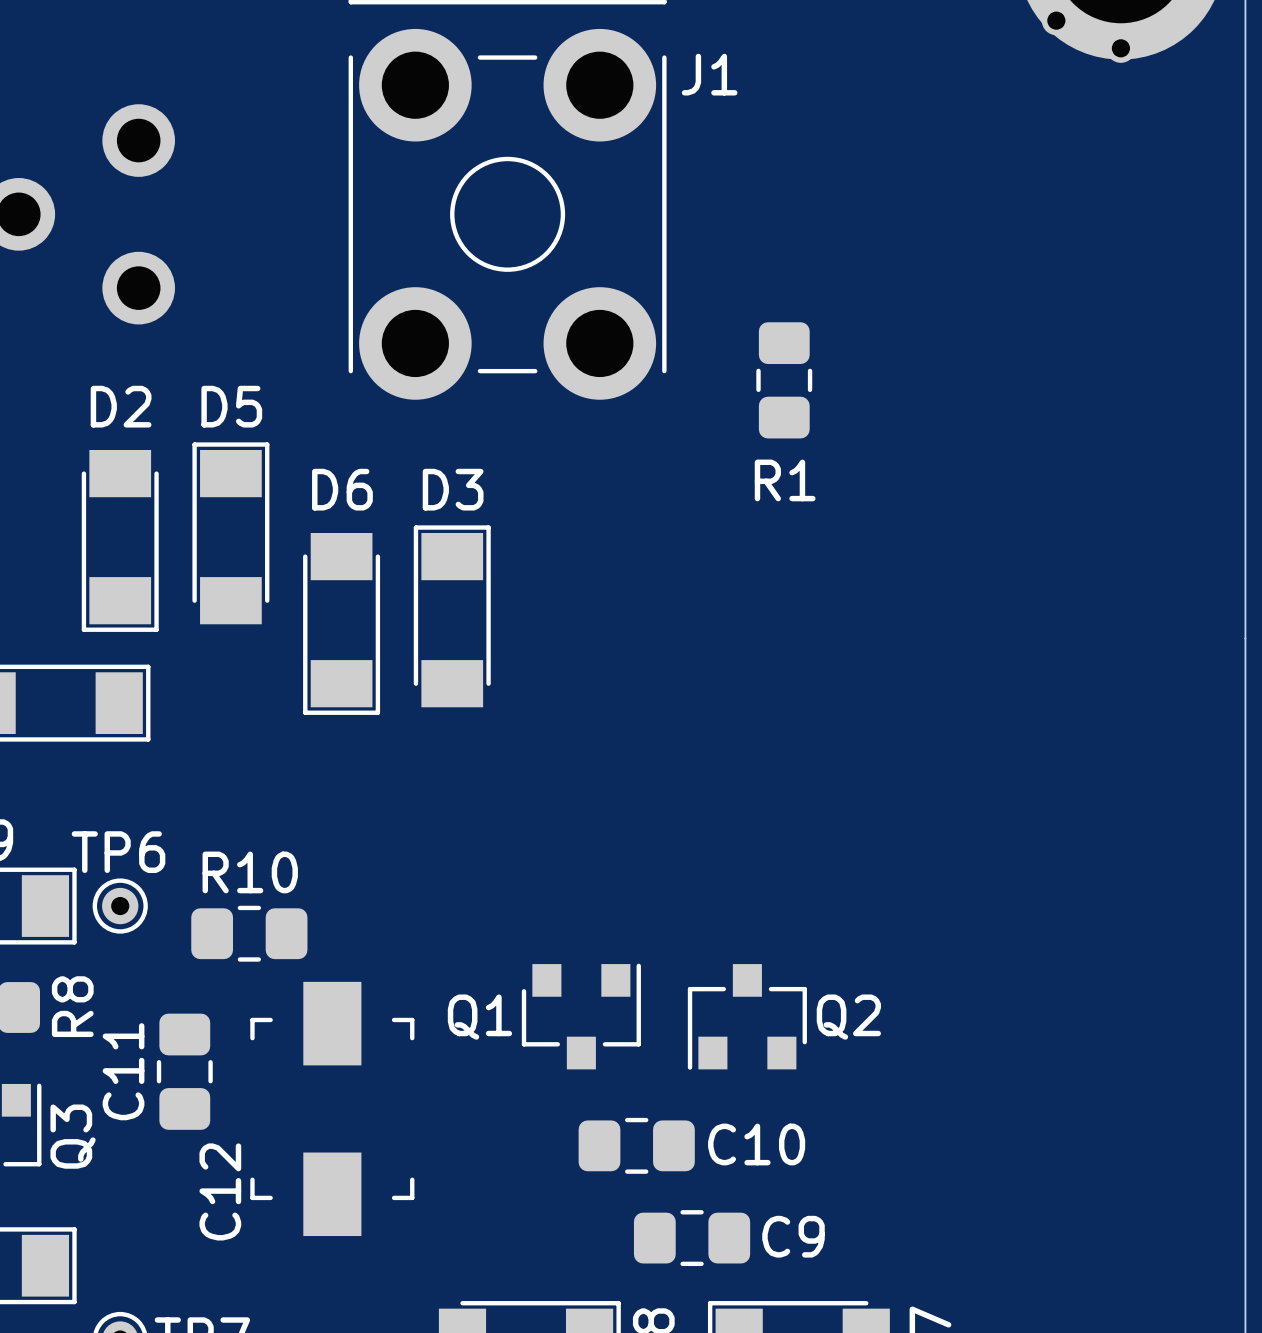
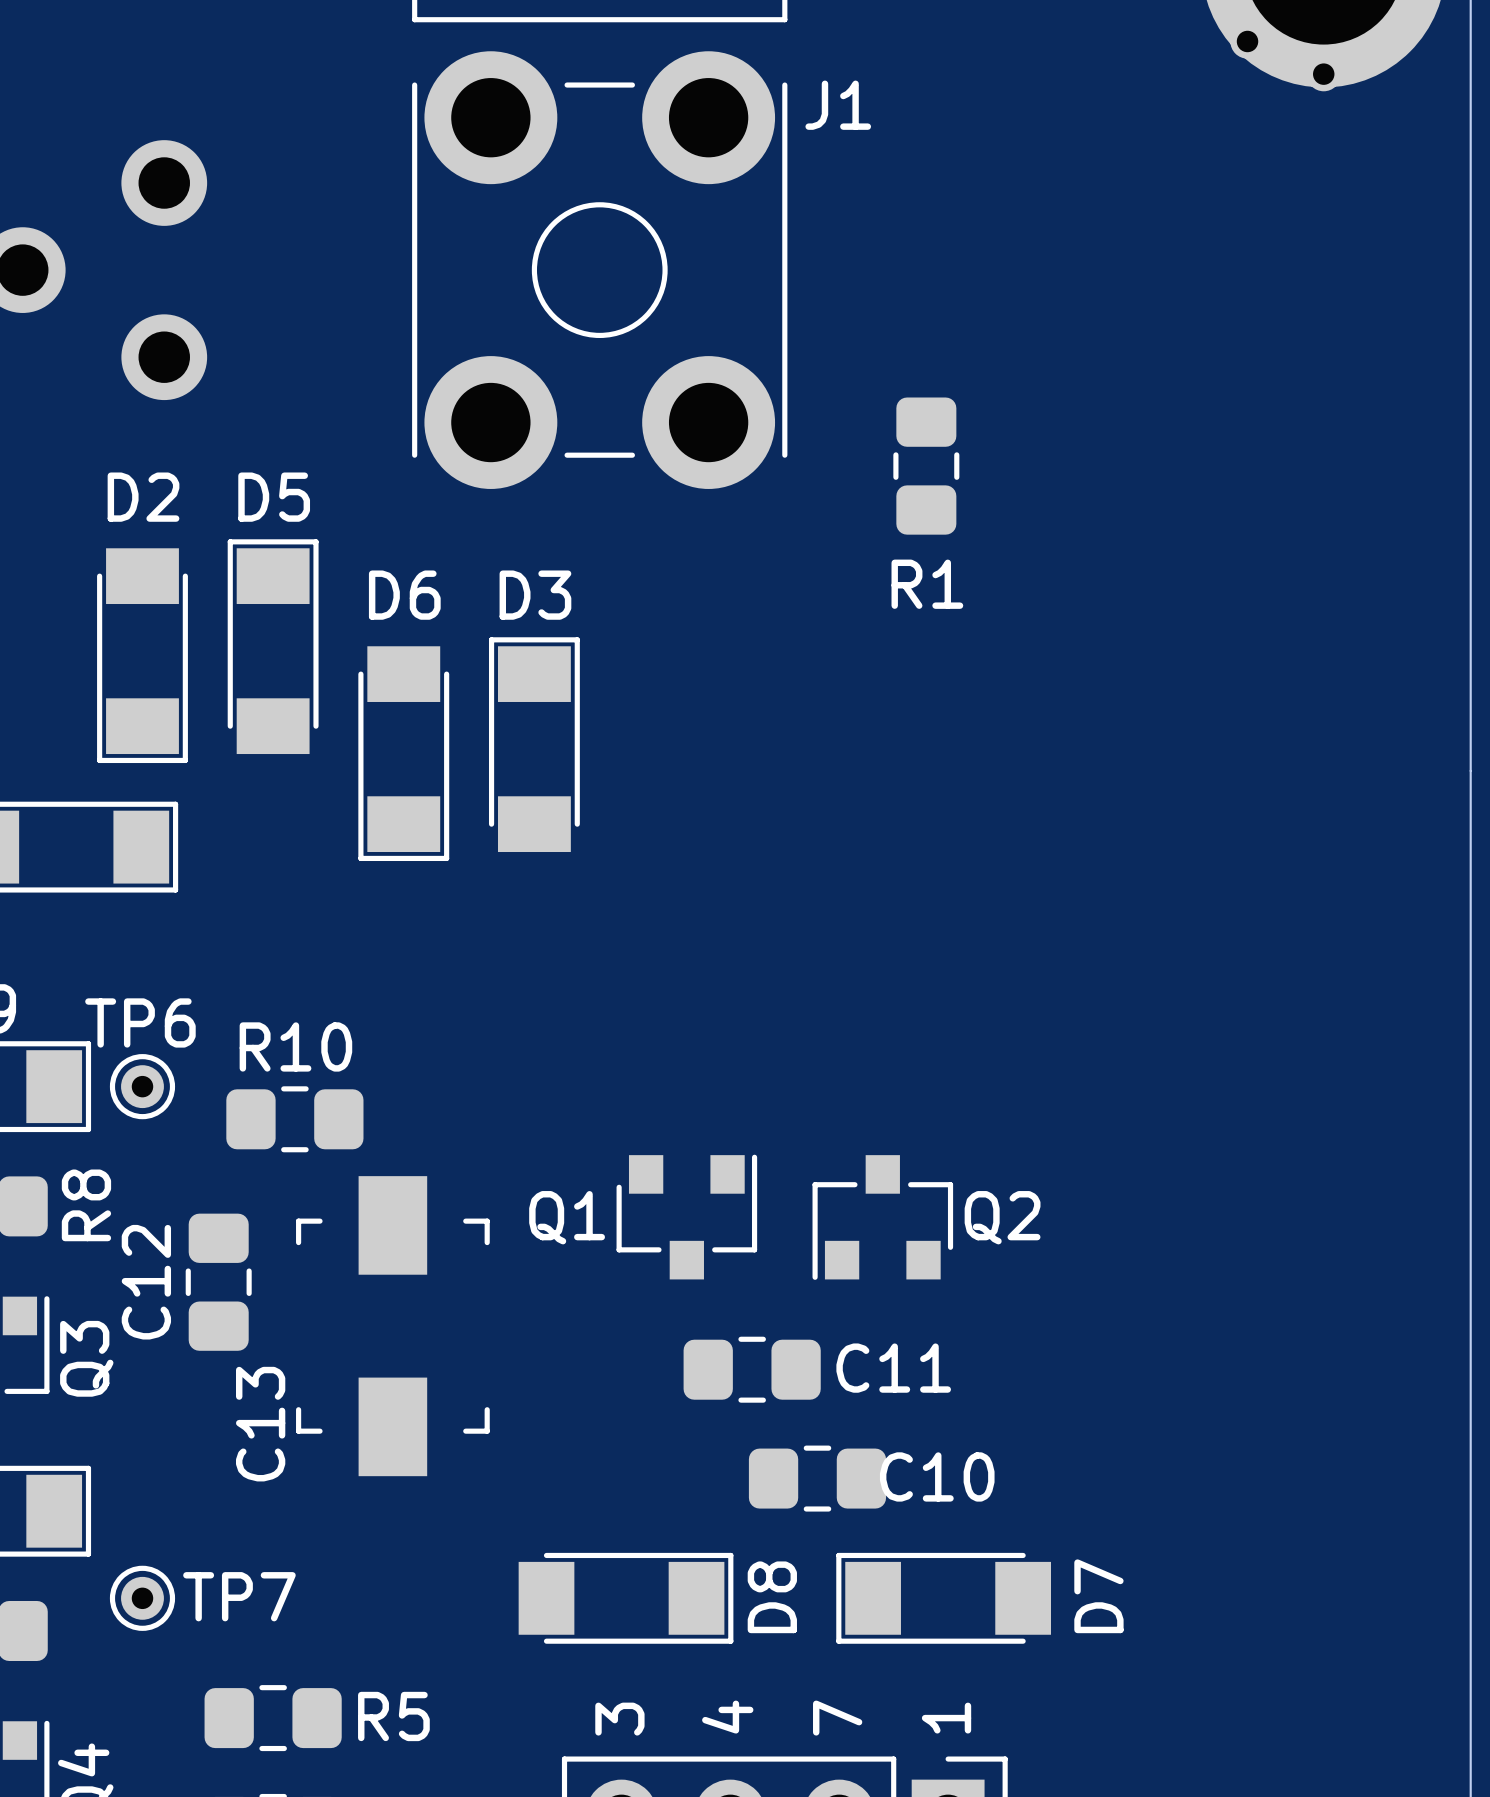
C11 name: C11 (123, 1071) -> C12 (146, 1282)
C10 name: C10 (756, 1144) -> C11 (893, 1368)
C12 name: C12 (220, 1191) -> C13 (260, 1424)
C9 name: C9 (793, 1236) -> C10 (937, 1476)

